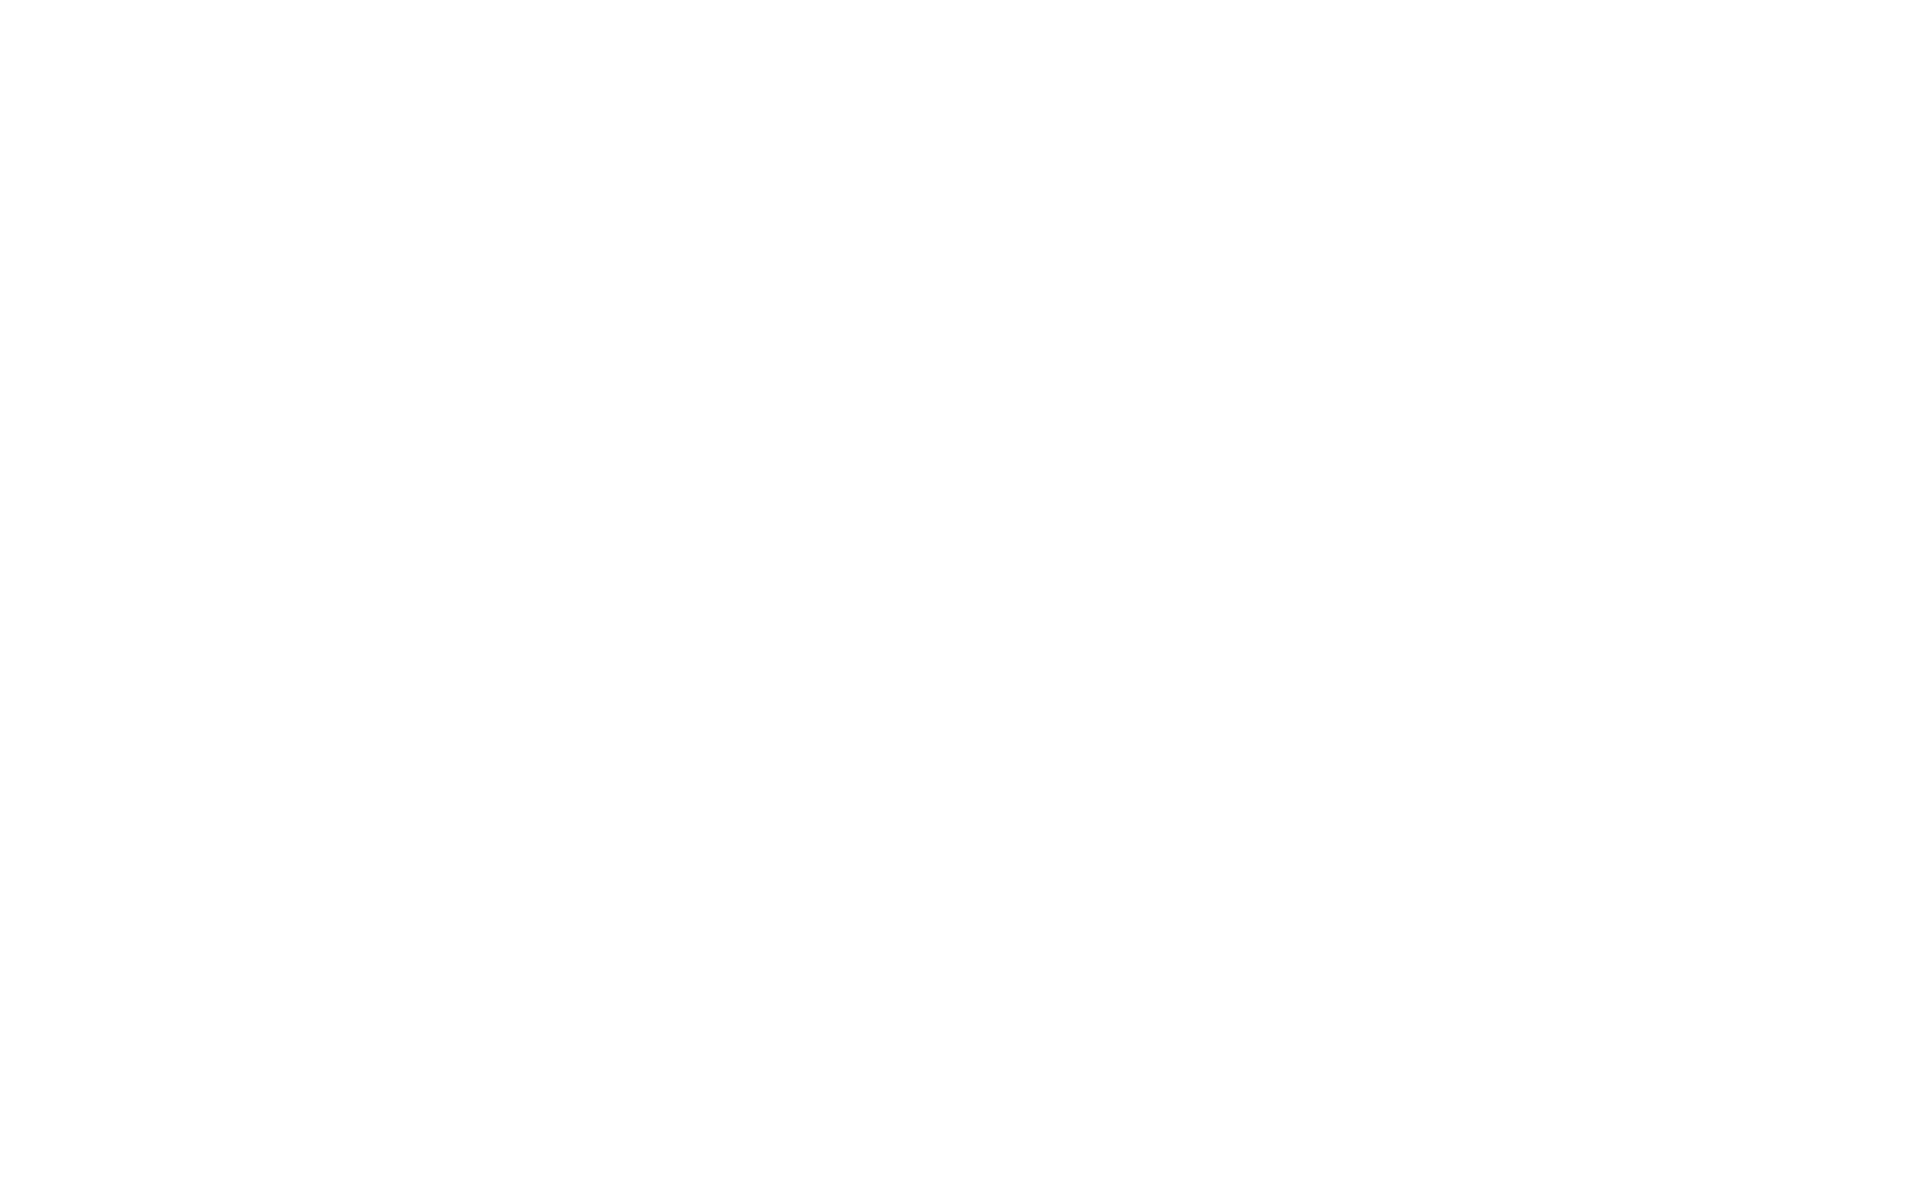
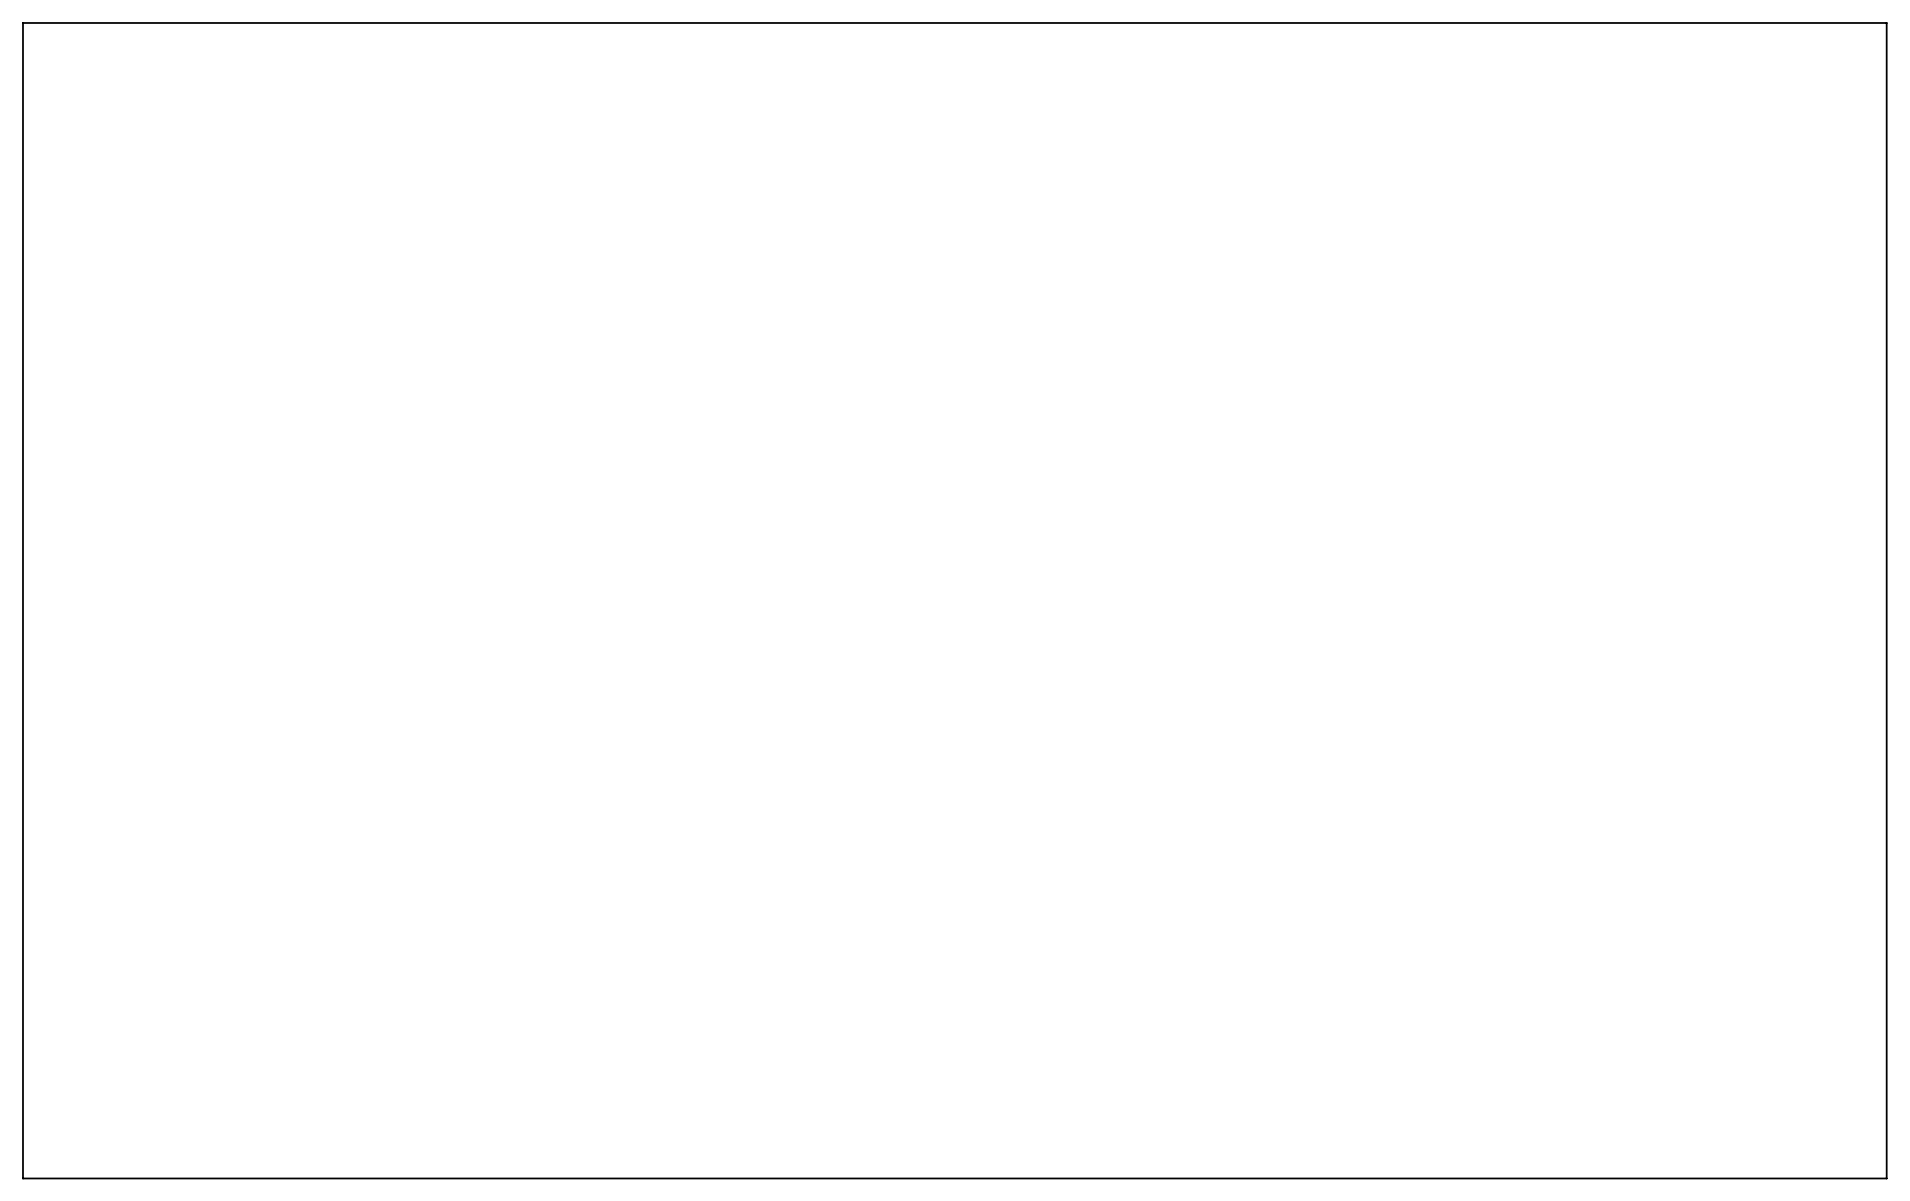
board edge: none -> (1886, 22) (22, 22) (22, 1178) (1886, 1178) (1886, 22)

